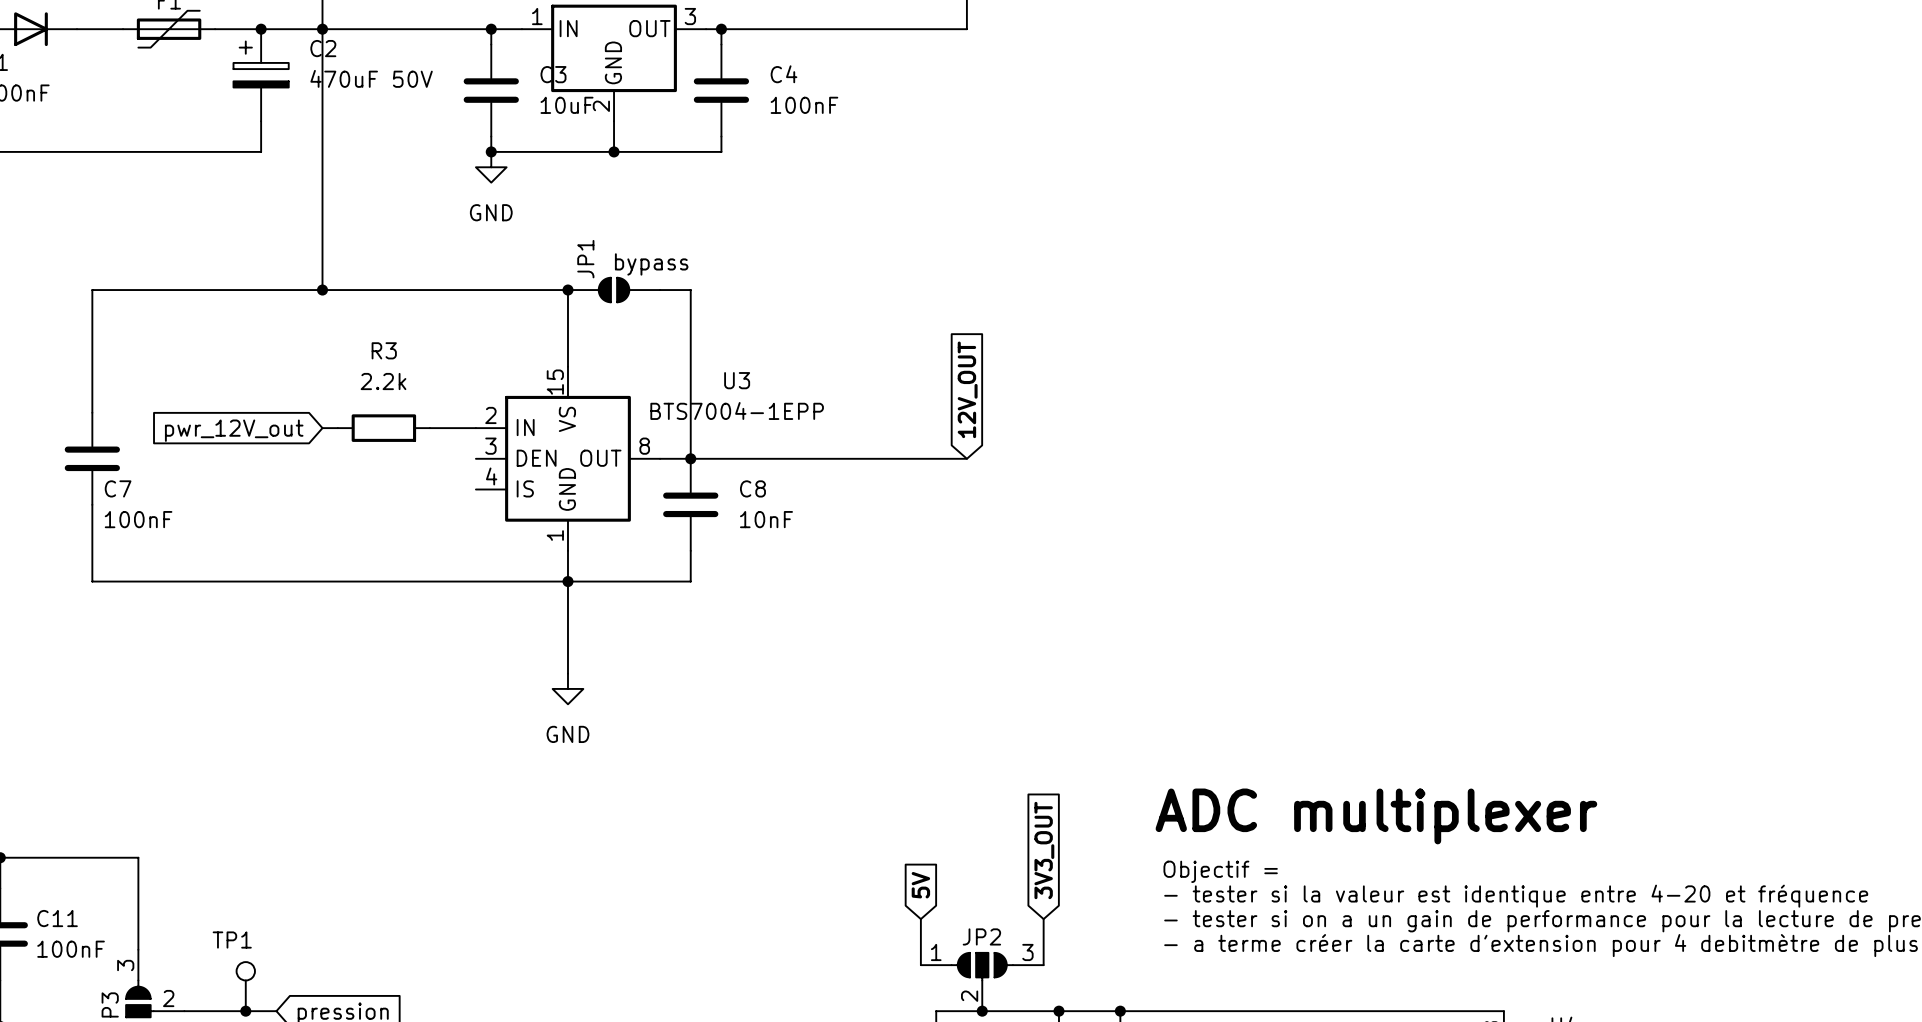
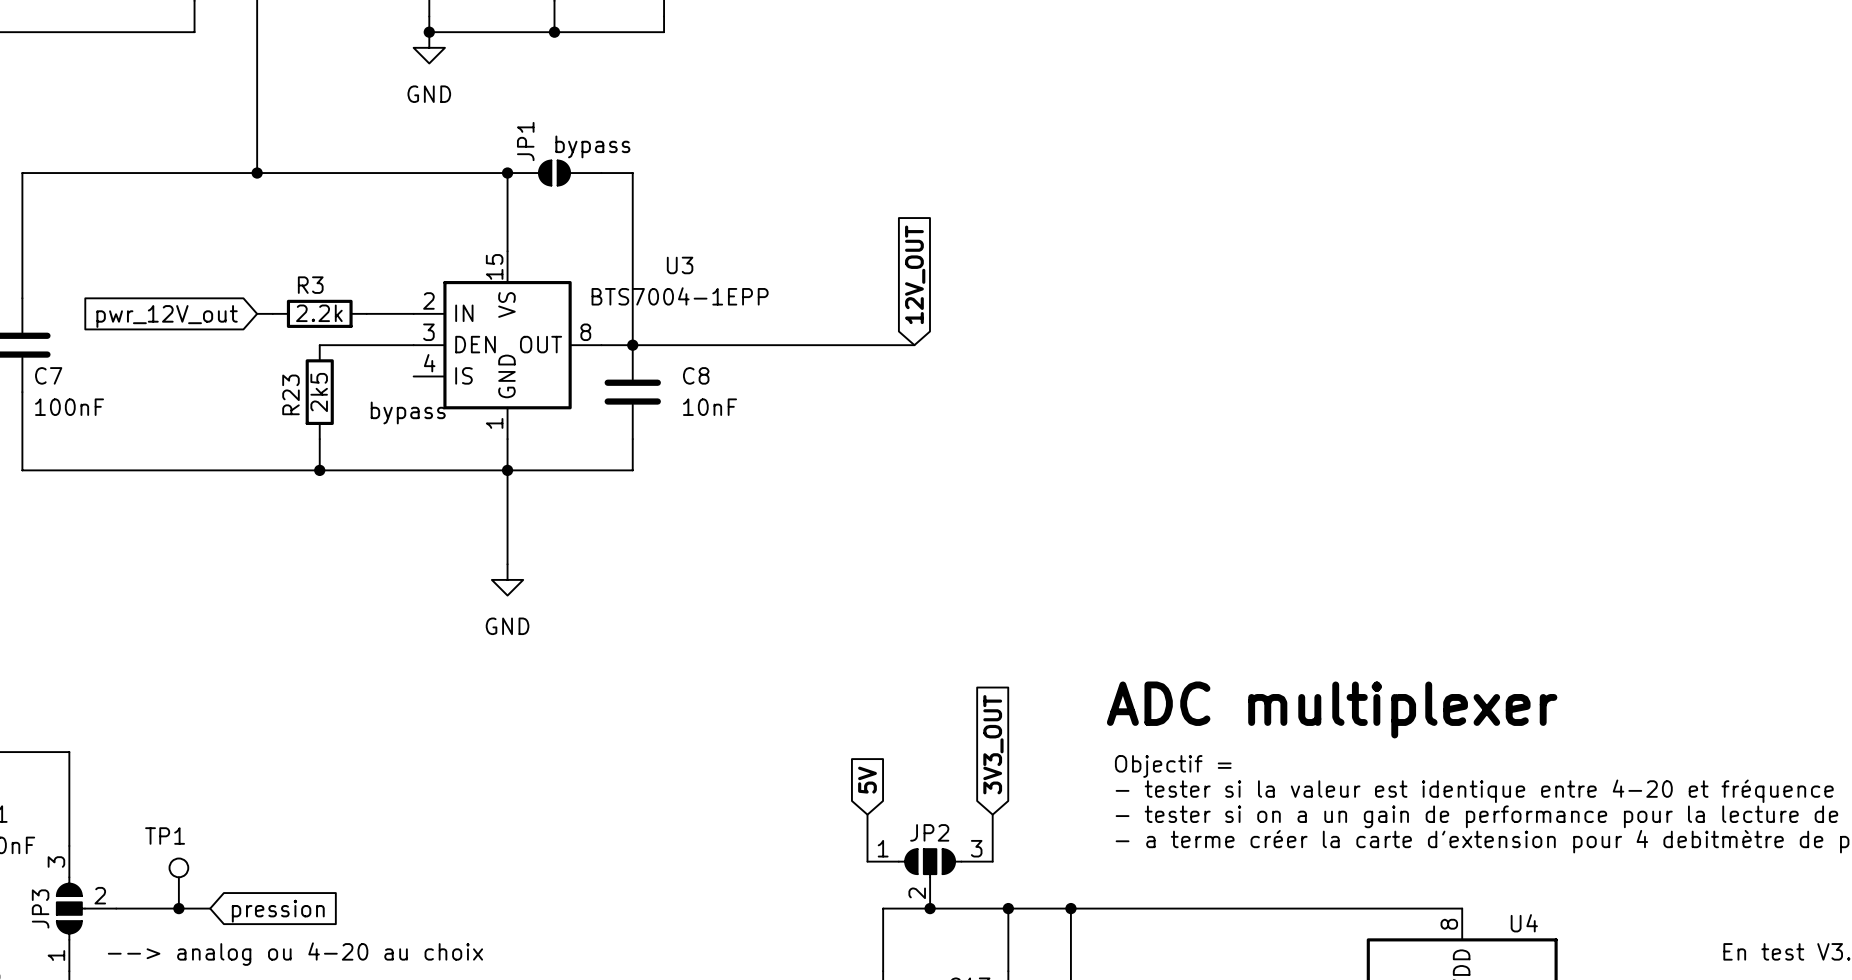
R3 name position: R3 (384, 350) -> R3 (310, 285)
R3 value position: 2.2k (383, 381) -> 2.2k (319, 313)
wire: none -> (319, 345) (413, 345)
R23: none -> 2k5 (319, 392)
text: none -> bypass (408, 412)
wire: none -> (319, 439) (319, 470)
junction: none -> (319, 470)

